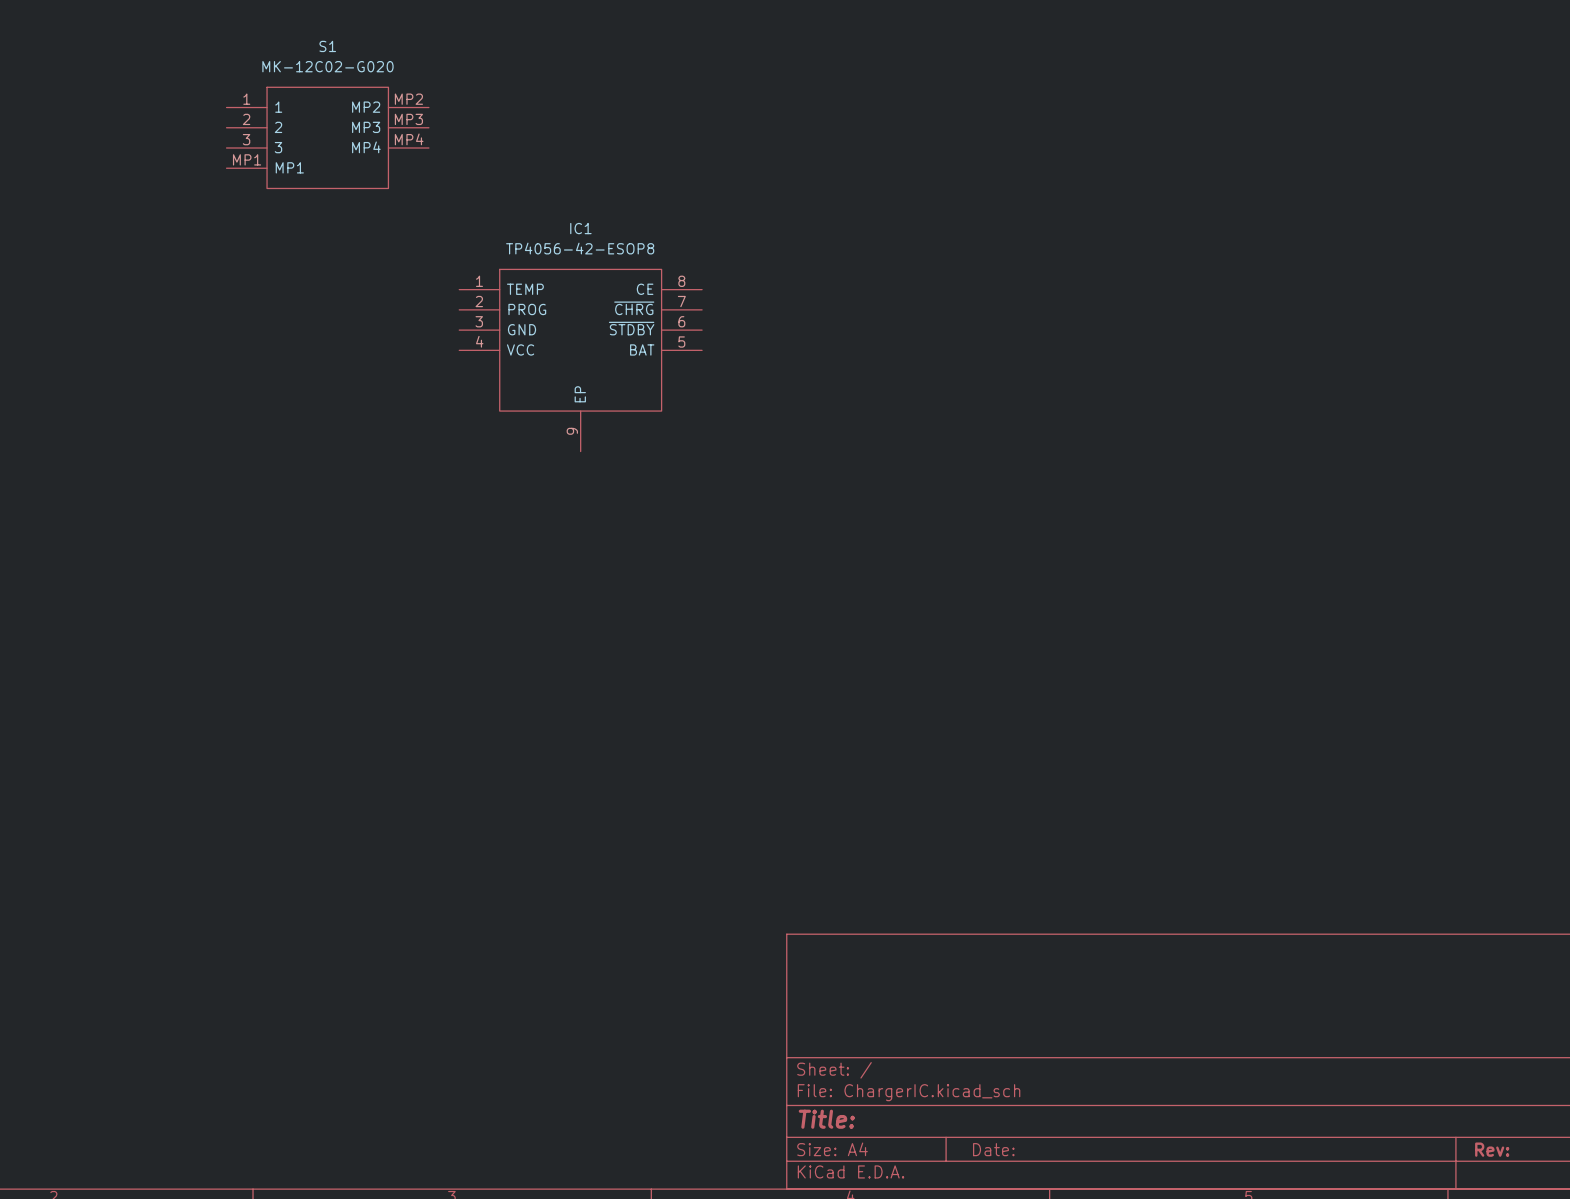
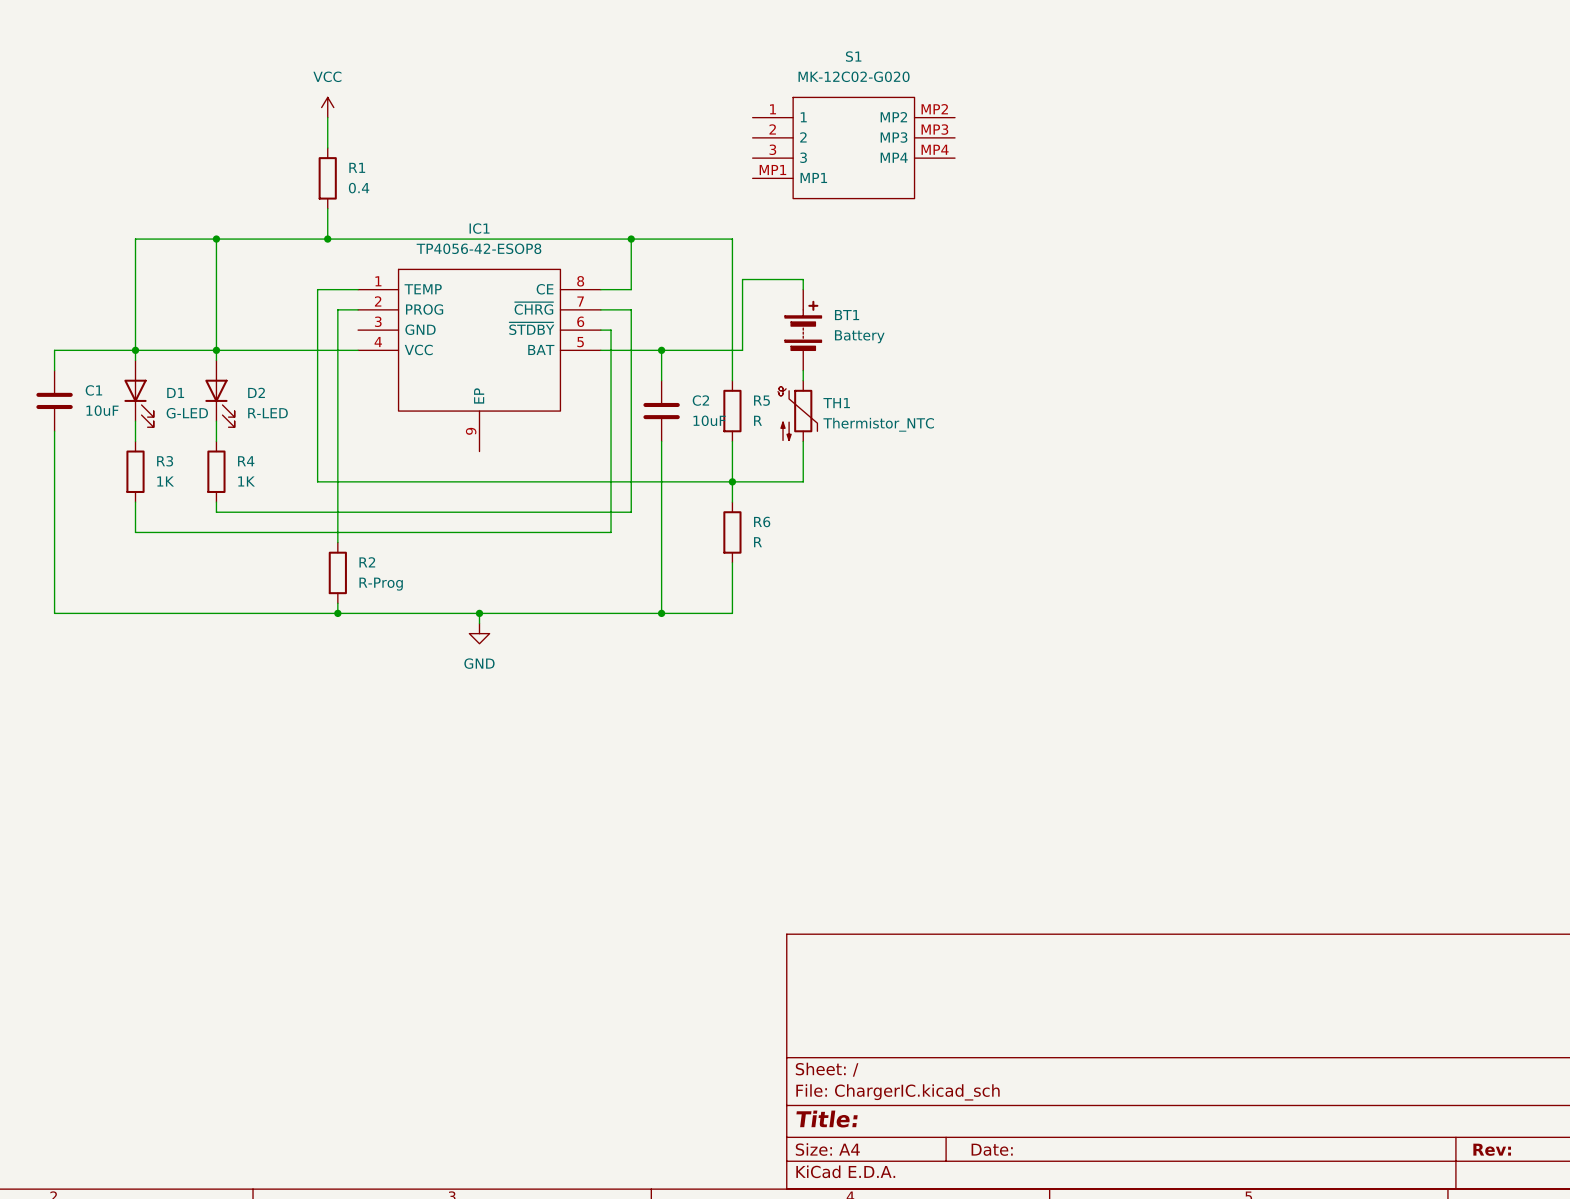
power symbol: none -> VCC (327, 107)
wire: none -> (327, 117) (327, 148)
S1 position: (327, 137) -> (853, 148)
R1: none -> 0.4 (327, 178)
wire: none -> (327, 208) (327, 239)
wire: none -> (216, 239) (216, 360)
junction: none -> (216, 239)
junction: none -> (327, 239)
wire: none -> (631, 239) (631, 289) (600, 289)
junction: none -> (631, 239)
wire: none -> (358, 289) (317, 289) (317, 481) (803, 481) (803, 441)
wire: none -> (803, 289) (803, 279) (742, 279) (742, 350) (600, 350)
wire: none -> (358, 309) (337, 309) (337, 542)
wire: none -> (600, 309) (631, 309) (631, 512) (216, 512) (216, 502)
wire: none -> (600, 330) (611, 330) (611, 532) (135, 532) (135, 502)
BT1: none -> Battery (803, 330)
junction: none -> (135, 350)
junction: none -> (216, 350)
wire: none -> (358, 350) (54, 350) (54, 370)
junction: none -> (661, 350)
wire: none -> (135, 360) (135, 239) (732, 239) (732, 380)
IC1 position: (580, 360) -> (479, 360)
wire: none -> (803, 370) (803, 380)
D1: none -> G-LED (139, 393)
D2: none -> R-LED (219, 393)
C1: none -> 10uF (54, 400)
C2: none -> 10uF (661, 411)
R5: none -> R (732, 411)
TH1: none -> Thermistor_NTC (797, 411)
wire: none -> (135, 421) (135, 441)
wire: none -> (216, 421) (216, 441)
wire: none -> (54, 431) (54, 613) (732, 613) (732, 562)
wire: none -> (661, 441) (661, 613)
wire: none -> (732, 441) (732, 502)
R3: none -> 1K (135, 471)
R4: none -> 1K (216, 471)
junction: none -> (732, 481)
R6: none -> R (732, 532)
R2: none -> R-Prog (337, 572)
wire: none -> (337, 603) (337, 613)
junction: none -> (337, 613)
wire: none -> (479, 613) (479, 623)
junction: none -> (479, 613)
junction: none -> (661, 613)
power symbol: none -> GND (479, 633)

